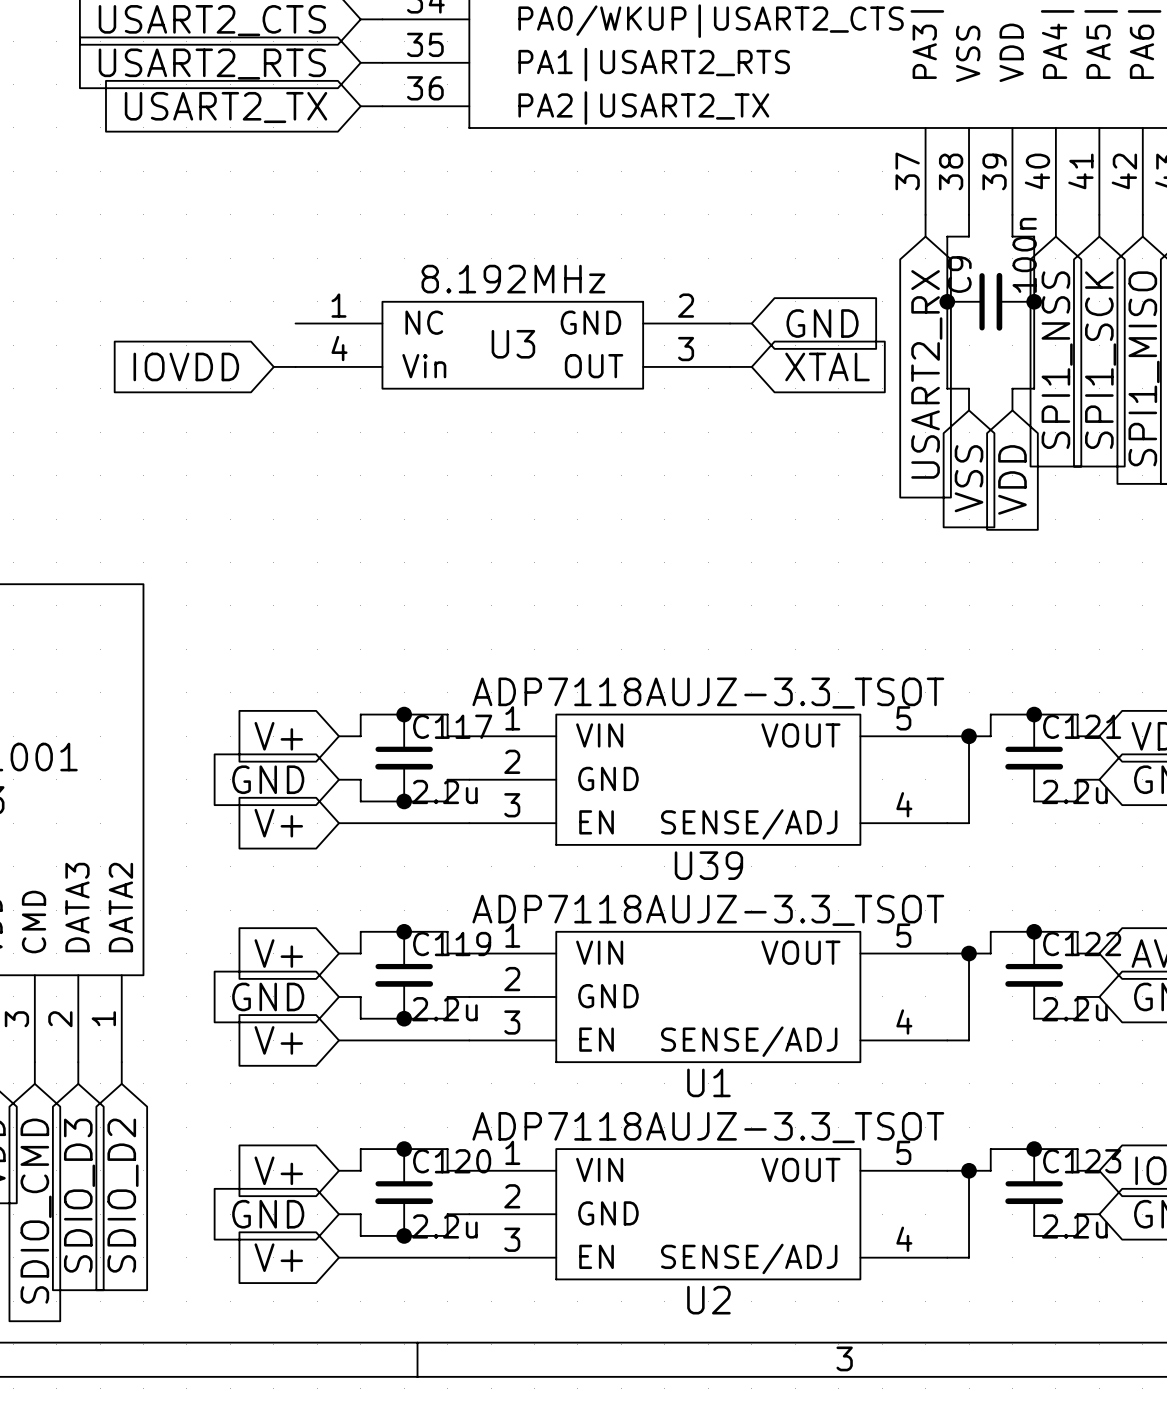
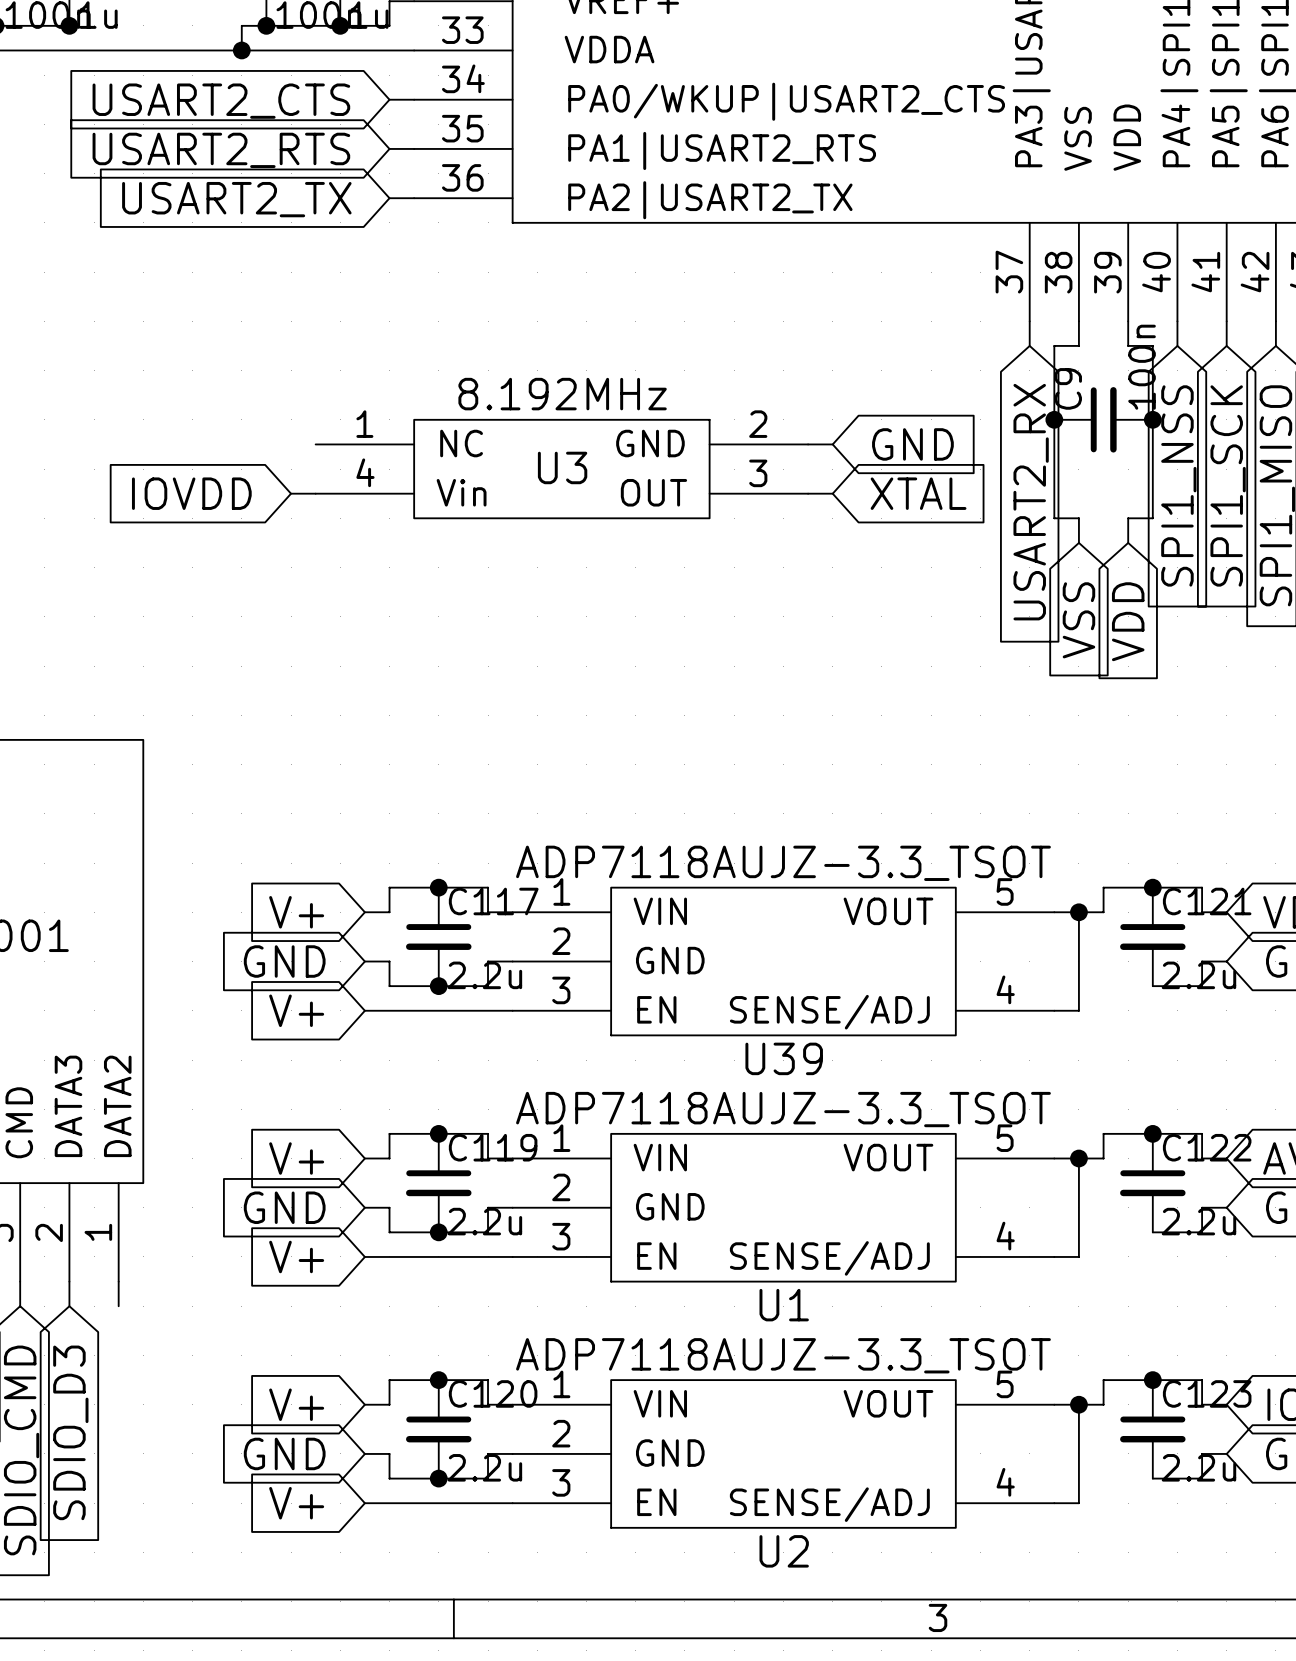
global label: SDIO_D2 (122, 1195) -> none

